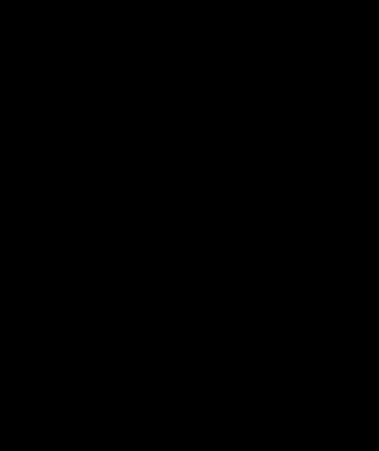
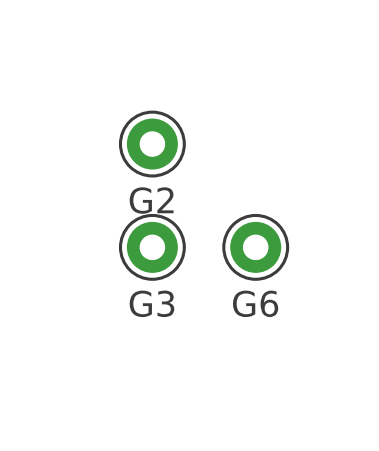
G2: none -> (152, 144)
G3: none -> (152, 247)
G6: none -> (255, 247)

